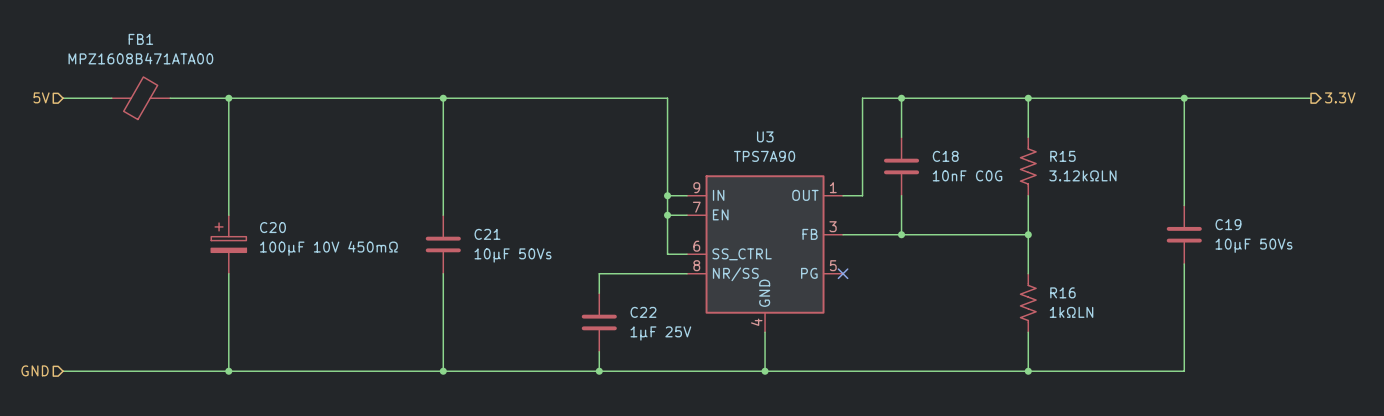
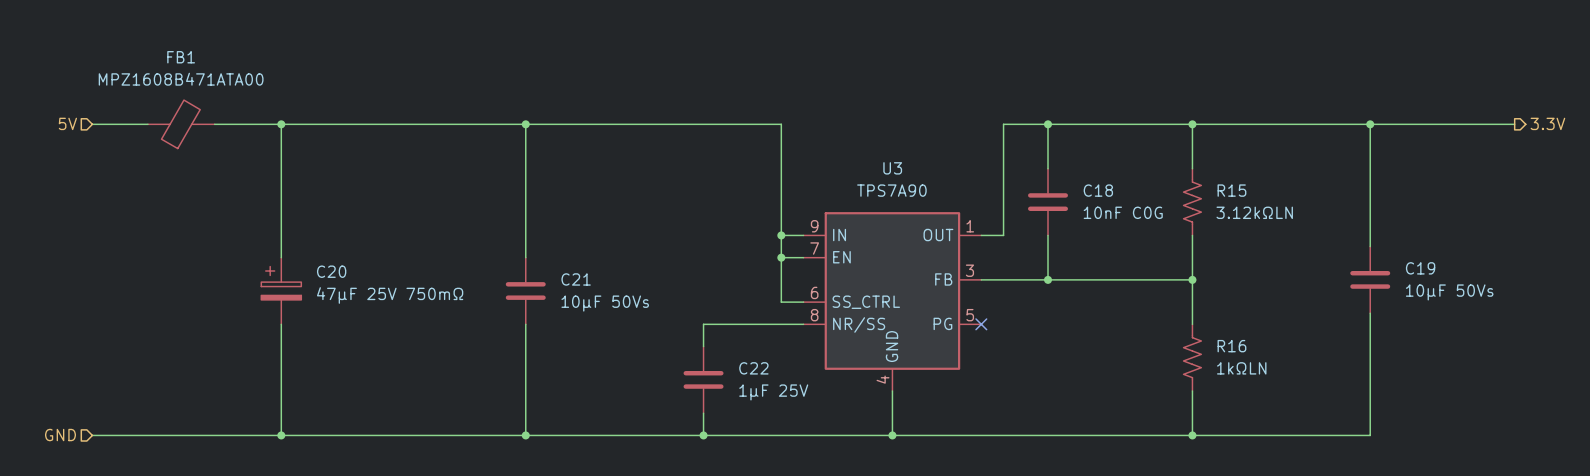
C20 value: 100µF 10V 450mΩ (328, 248) -> 47µF 25V 750mΩ (390, 295)

